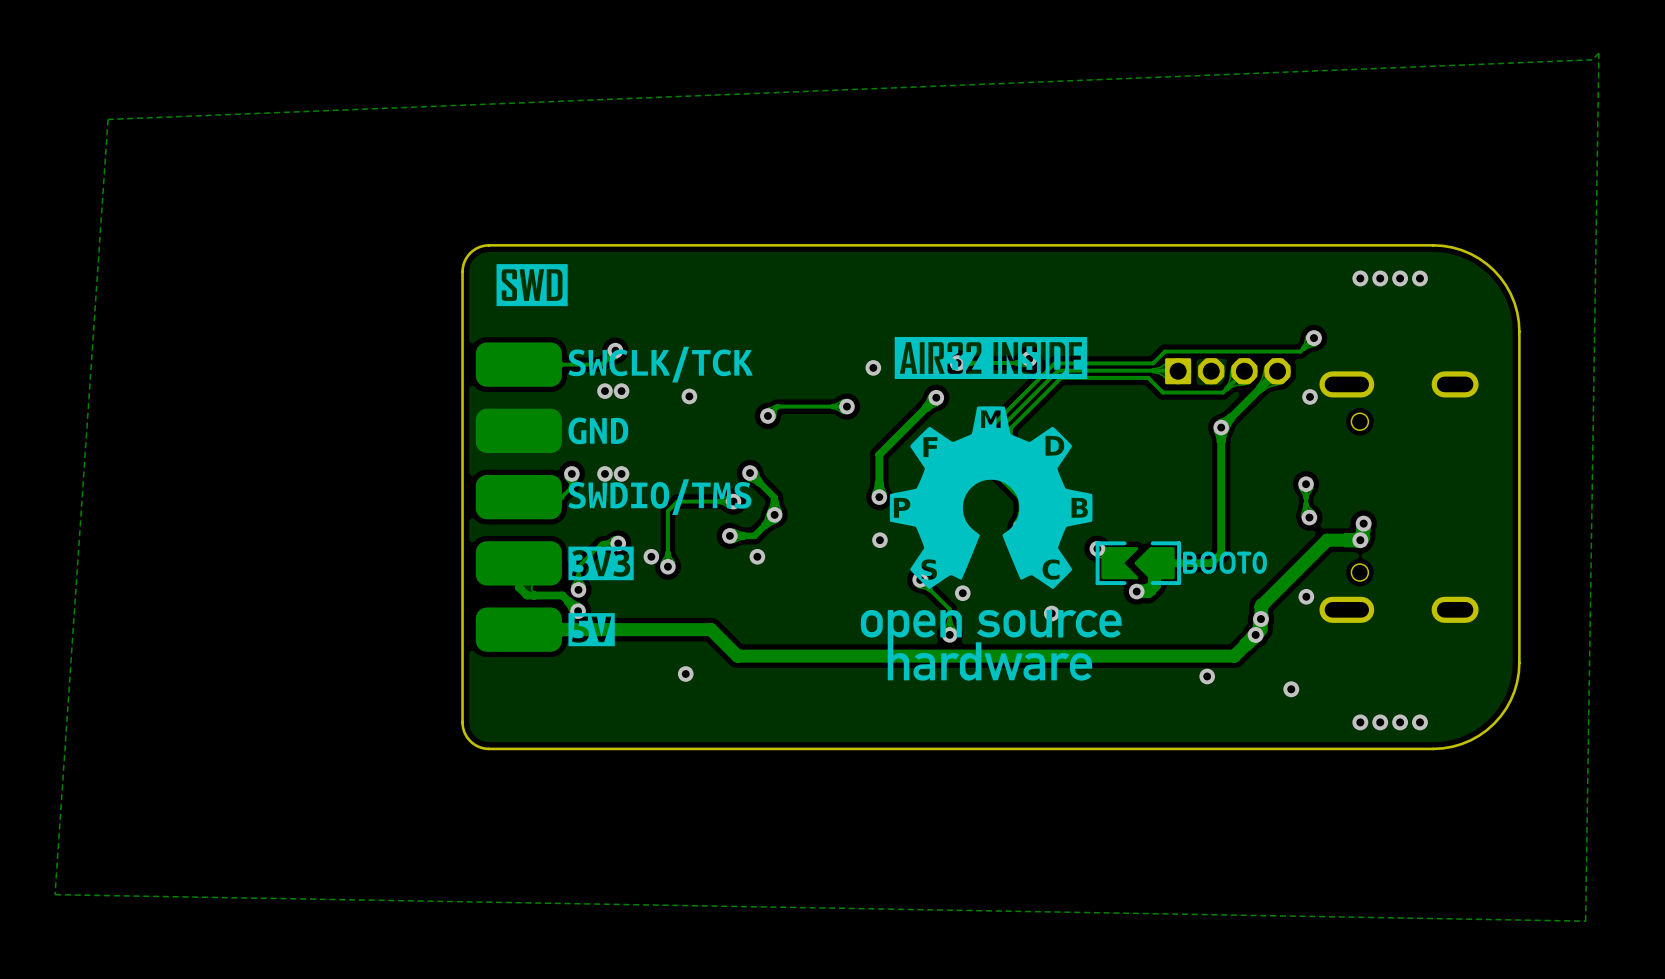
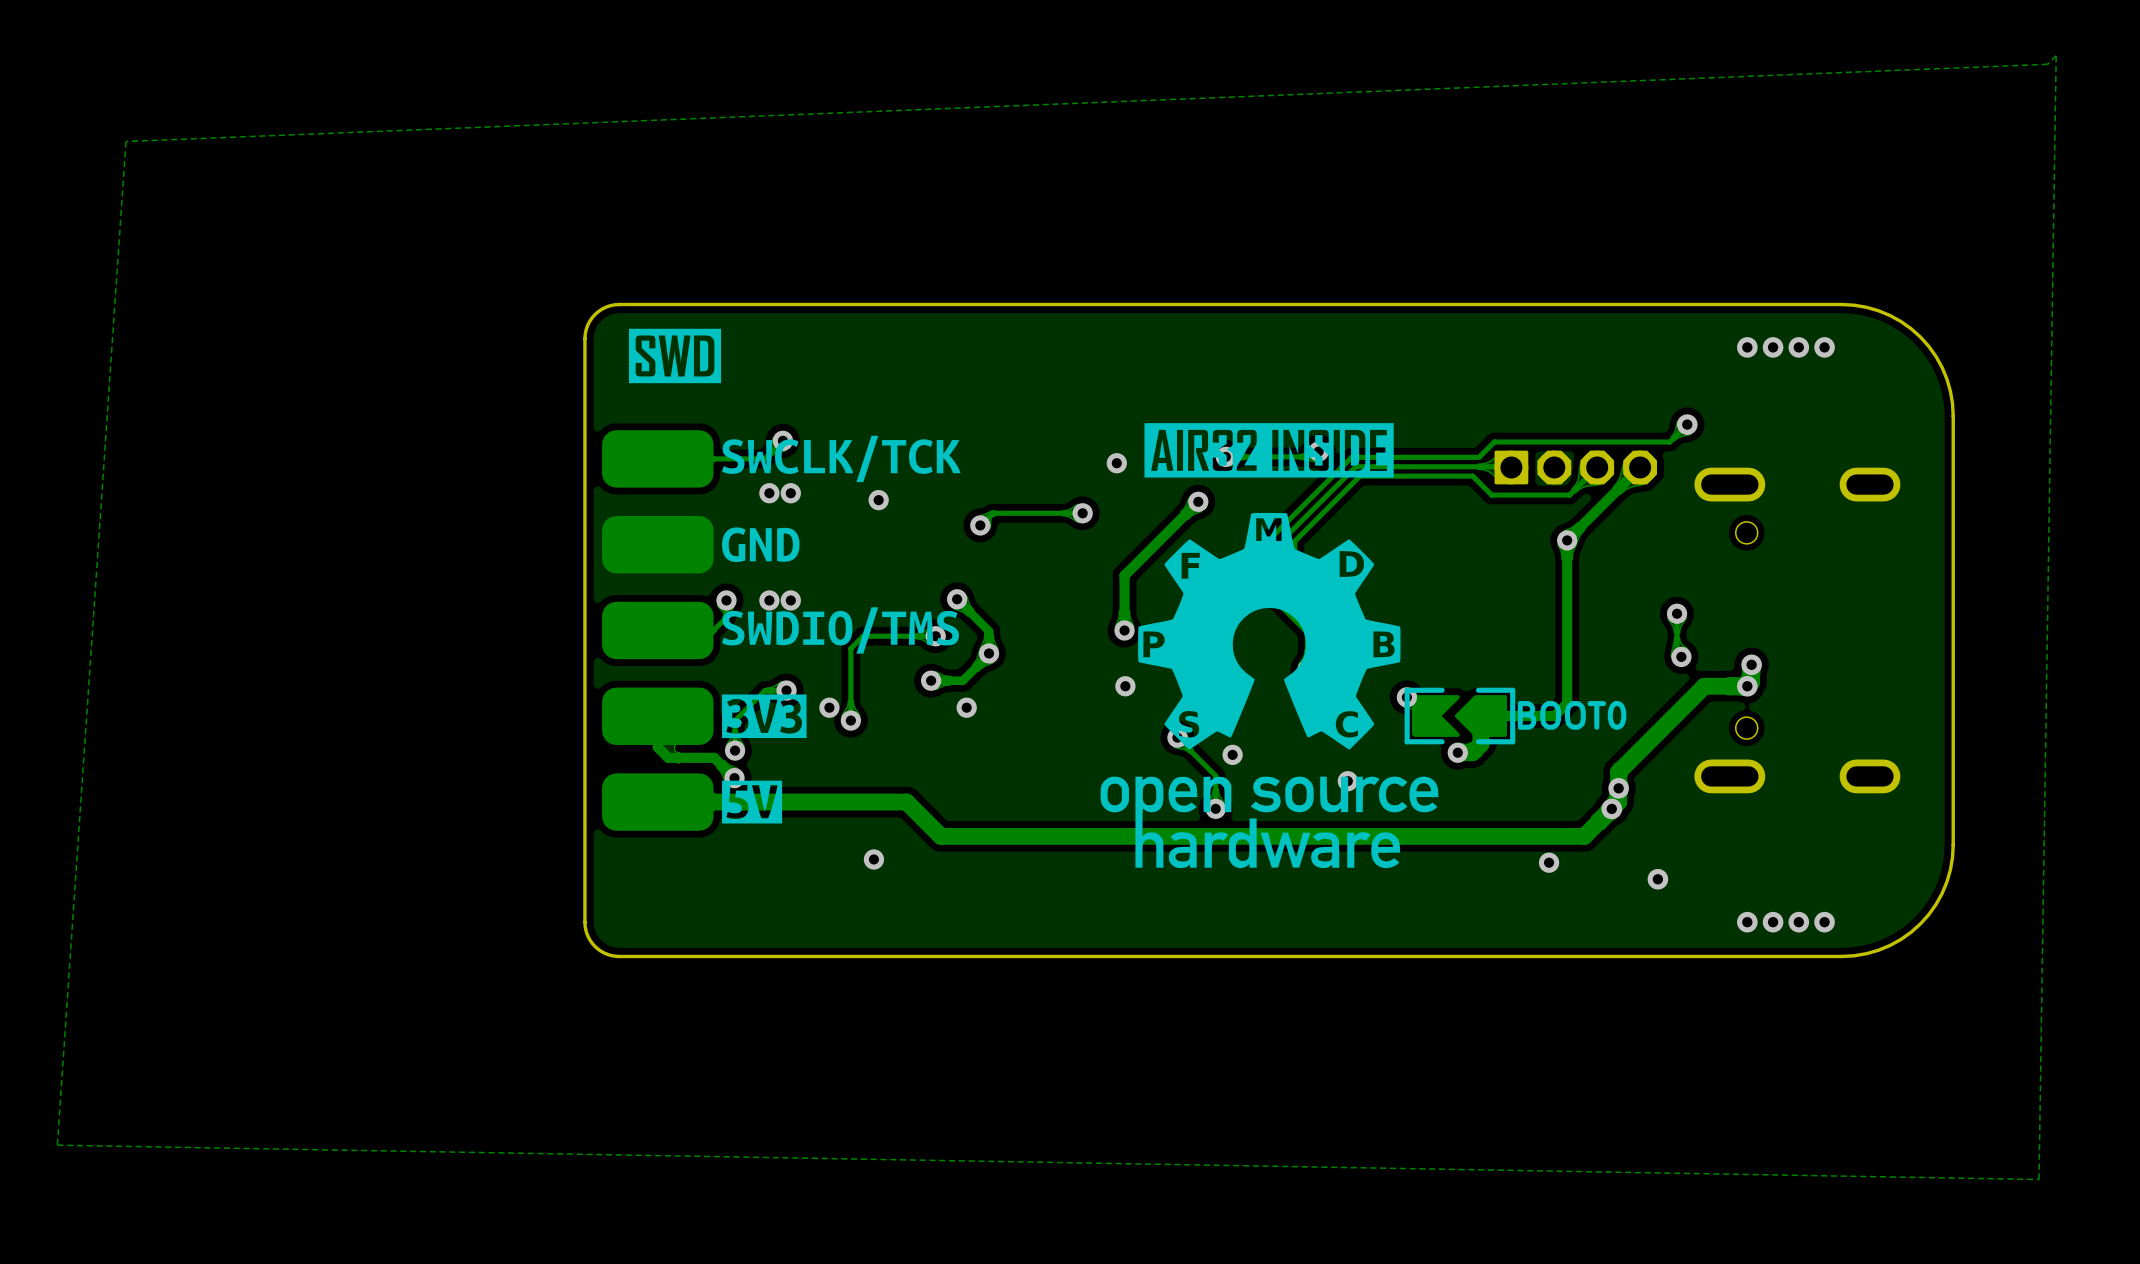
via: (1310, 396) -> none
via: (1306, 596) -> none

